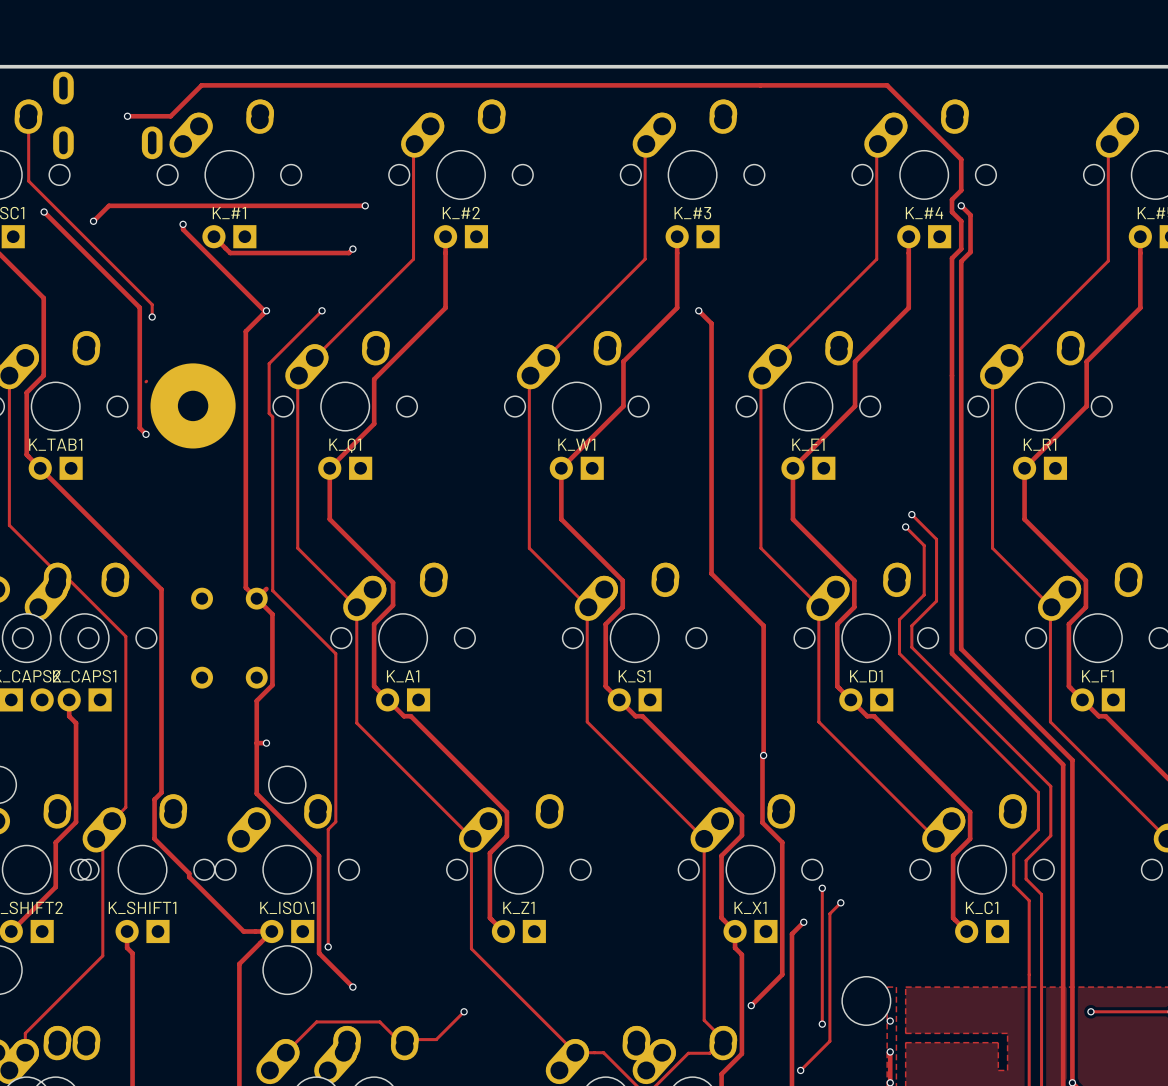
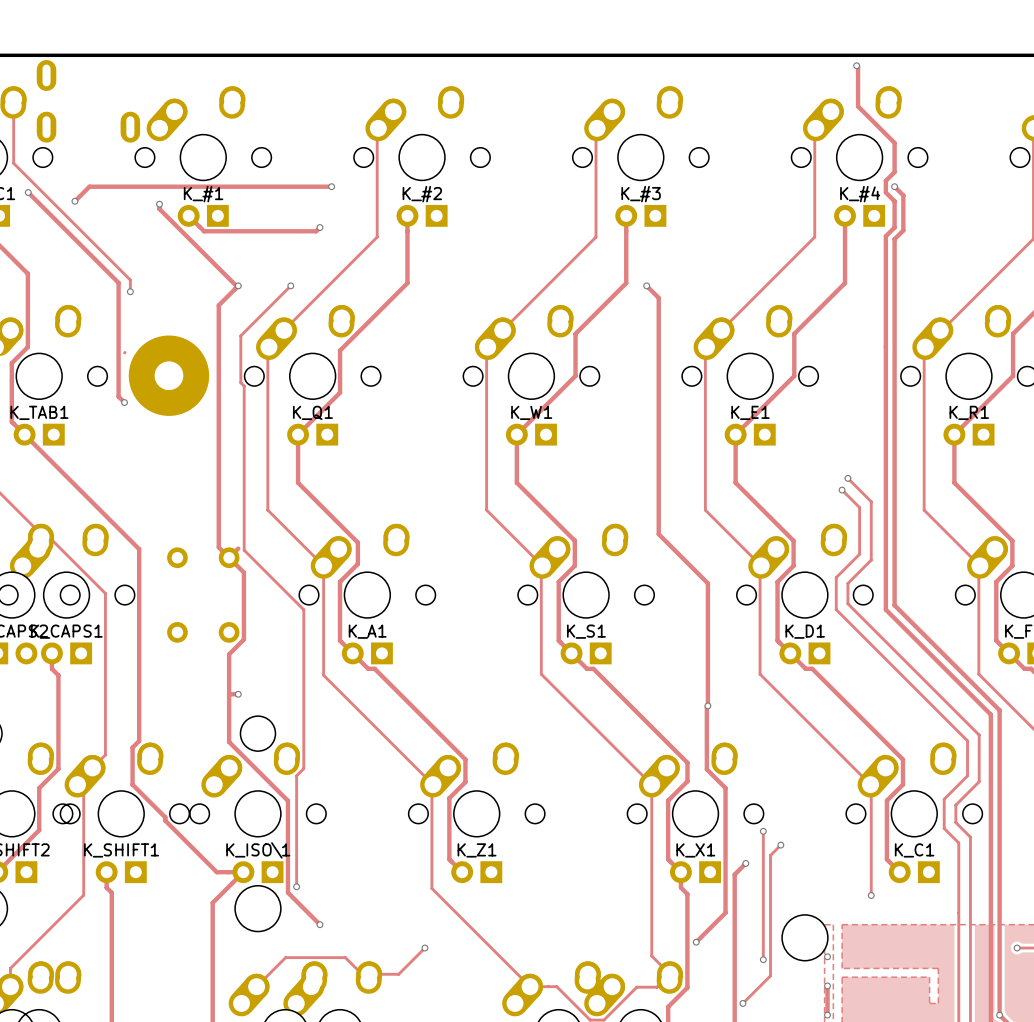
via: none -> (856, 65)
track: (127, 116) (170, 116) (201, 85) (887, 85) (922, 120) -> (856, 65) (858, 106)
via: (127, 116) -> none
track: none -> (870, 784) (871, 895)
via: none -> (871, 895)

